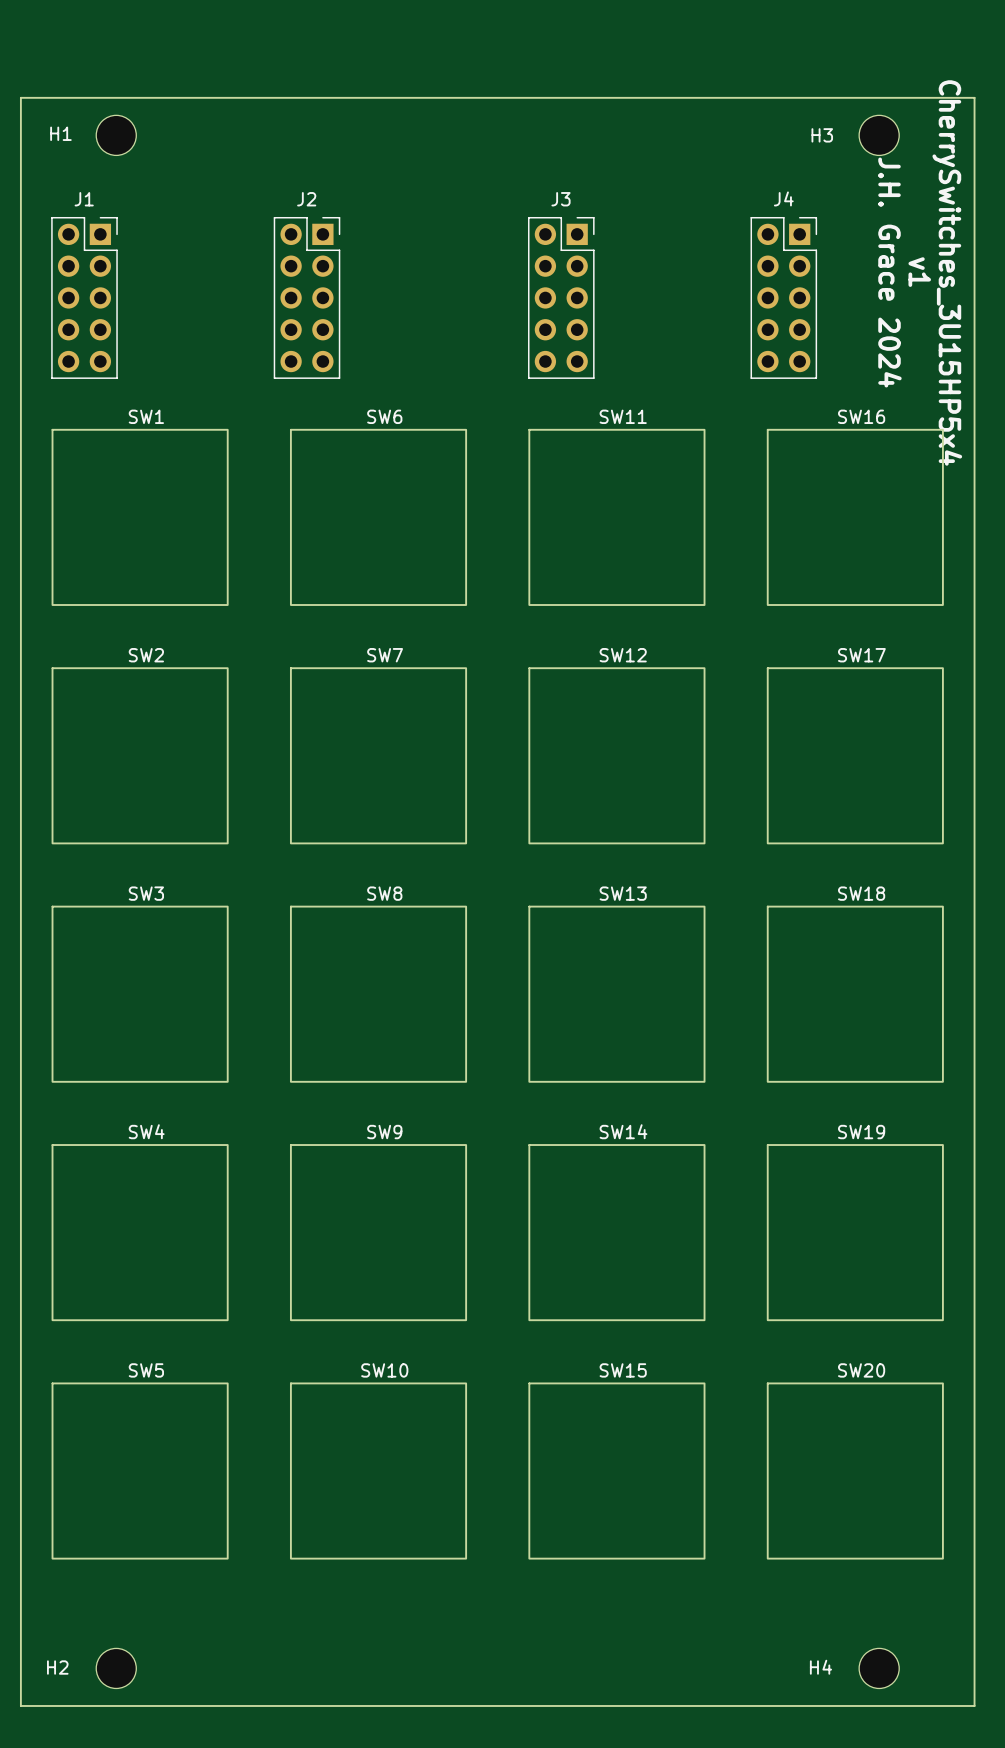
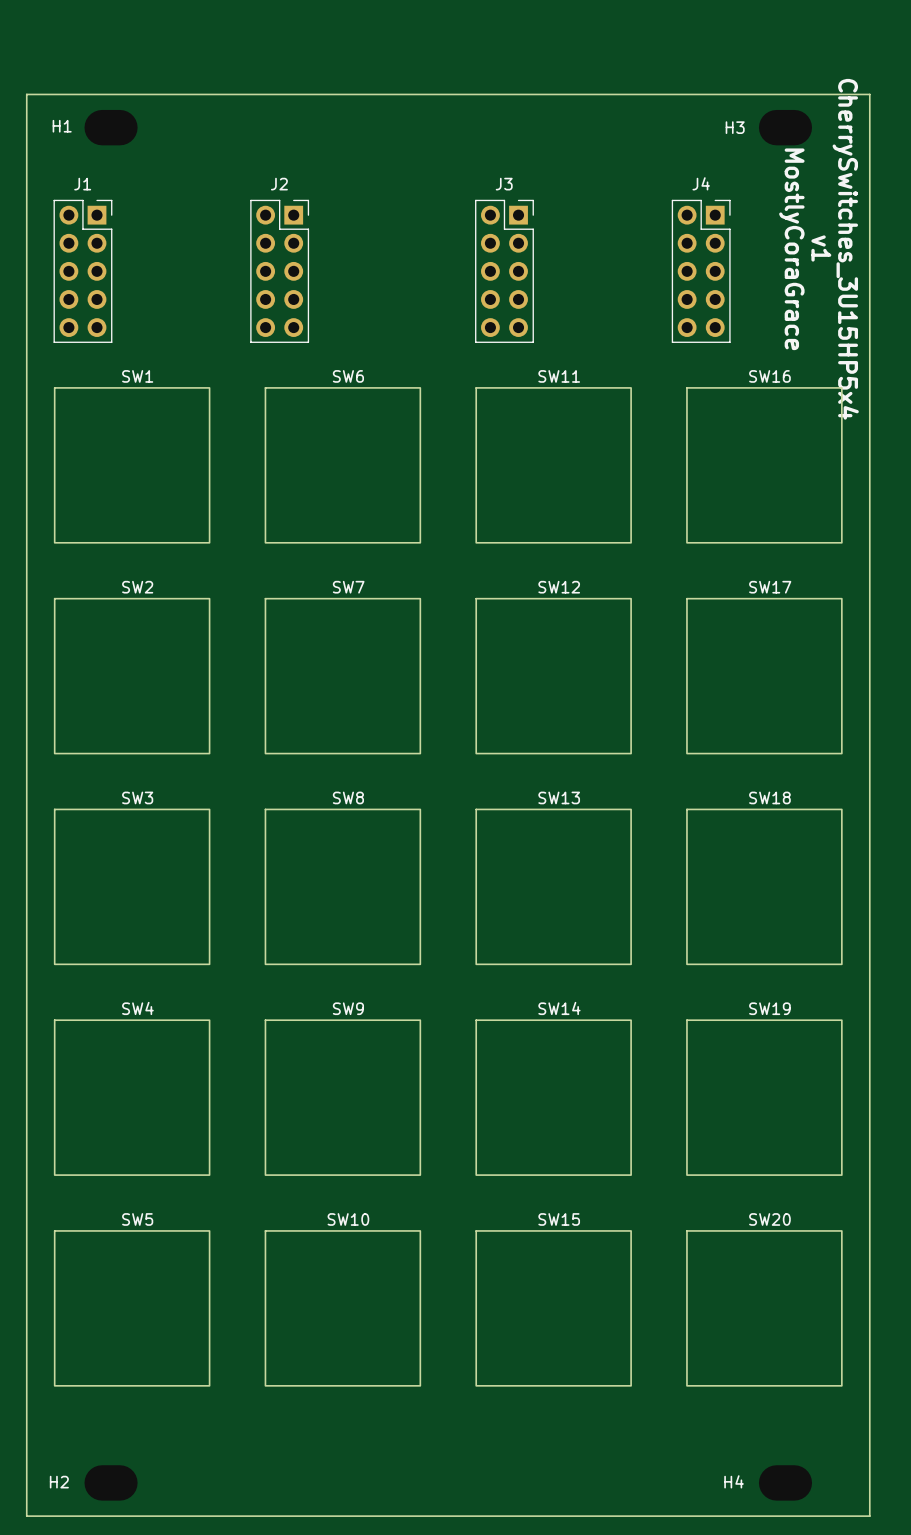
H1 footprint: [96, 115, 137, 156] -> [84, 109, 138, 146]
H3 footprint: [859, 115, 900, 156] -> [758, 109, 813, 146]
text: J.H. Grace 2024 (889, 272) -> MostlyCoraGrace (791, 249)
H2 footprint: [96, 1648, 137, 1689] -> [84, 1465, 138, 1501]
H4 footprint: [859, 1648, 900, 1689] -> [758, 1465, 813, 1501]

